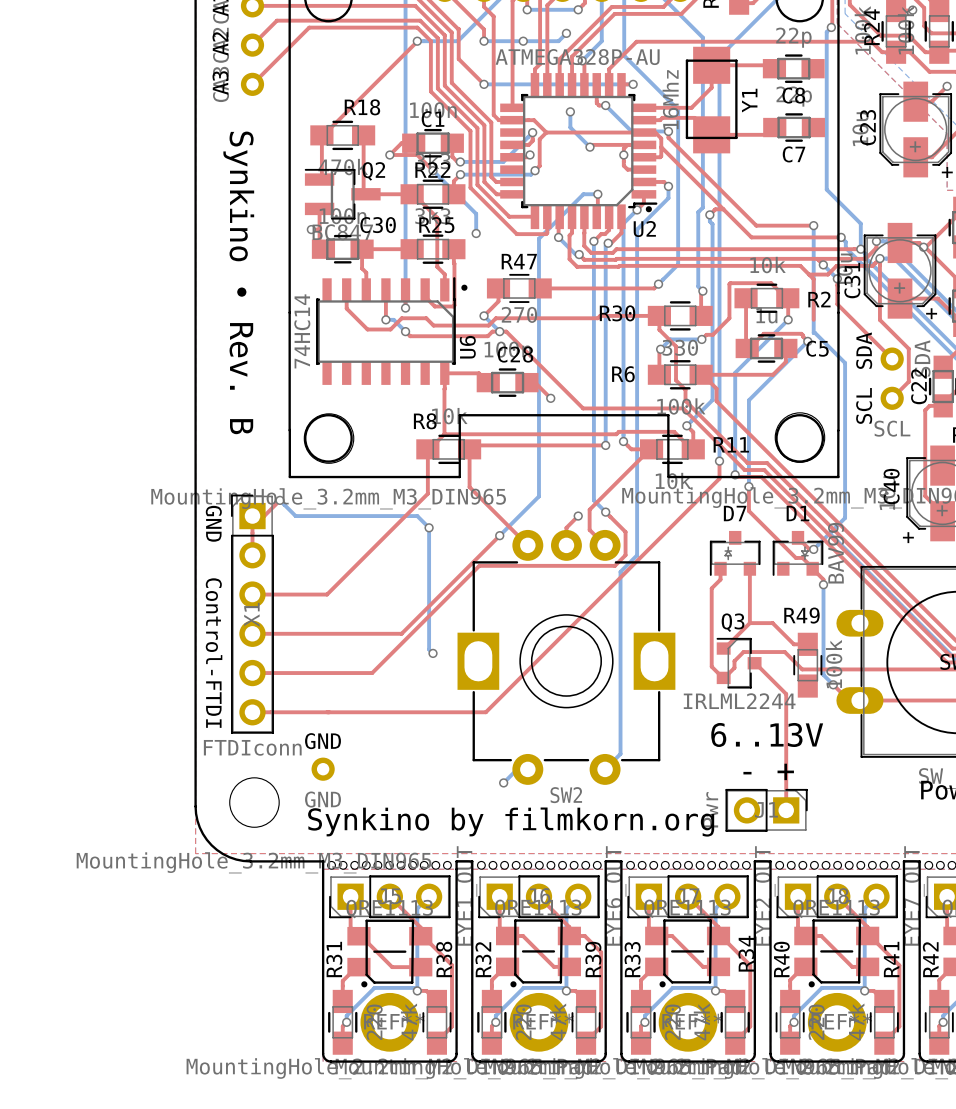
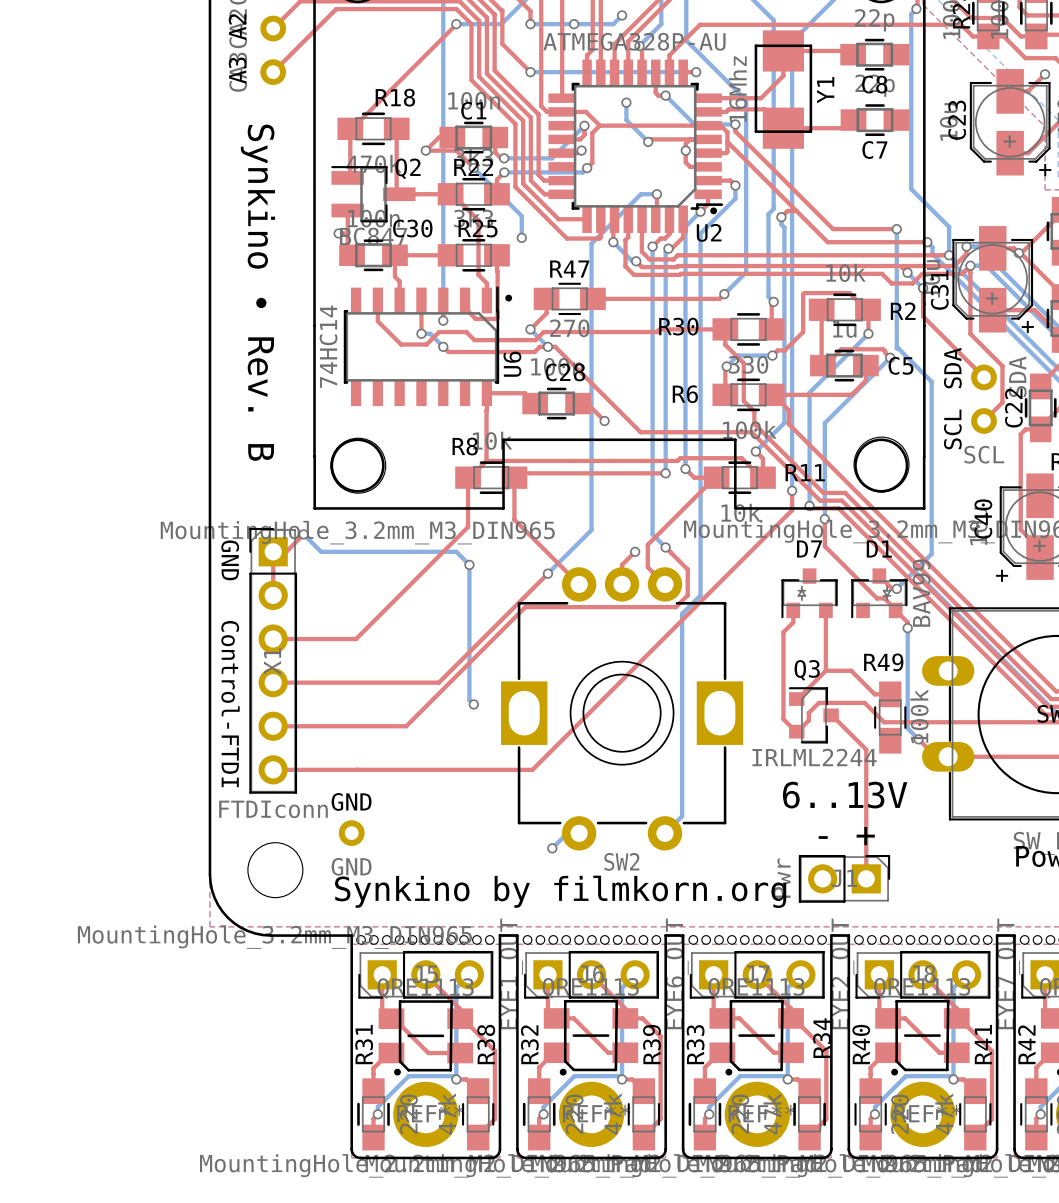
top track: (809, 274) (813, 279) (813, 319) -> none

